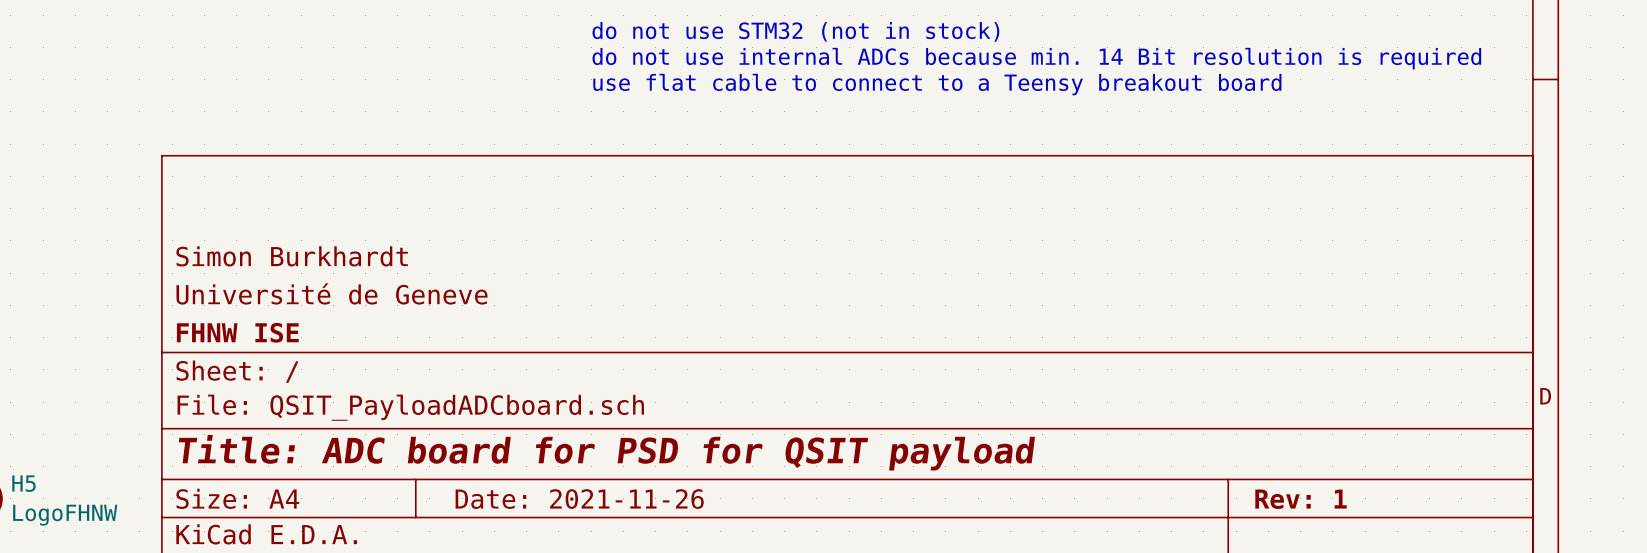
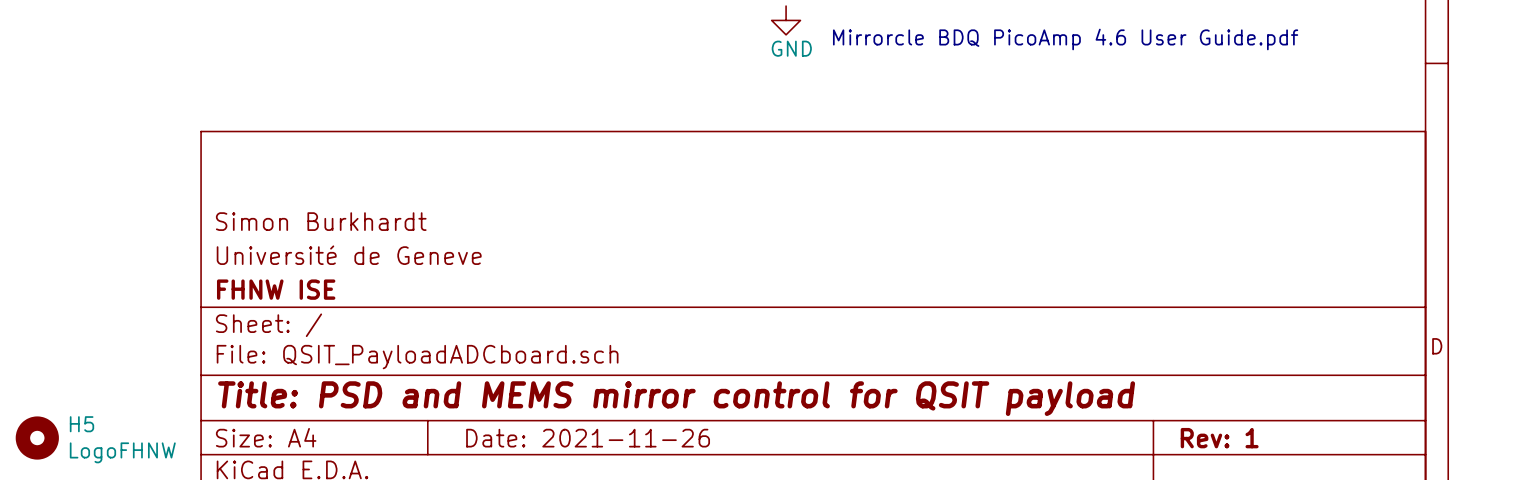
text: do not use STM32 (not in stock) (795, 31) -> none
power symbol: none -> GND (786, 20)
text: none -> Mirrorcle BDQ PicoAmp 4.6 User Guide.pdf (1065, 39)
text: do not use internal ADCs because min. 14 Bit resolution is required (1036, 58) -> none
text: use flat cable to connect to a Teensy breakout board (937, 84) -> none
title block: Title: ADC board for PSD for QSIT payload (606, 452) -> Title: PSD and MEMS mirror control for QSIT payload (676, 398)

